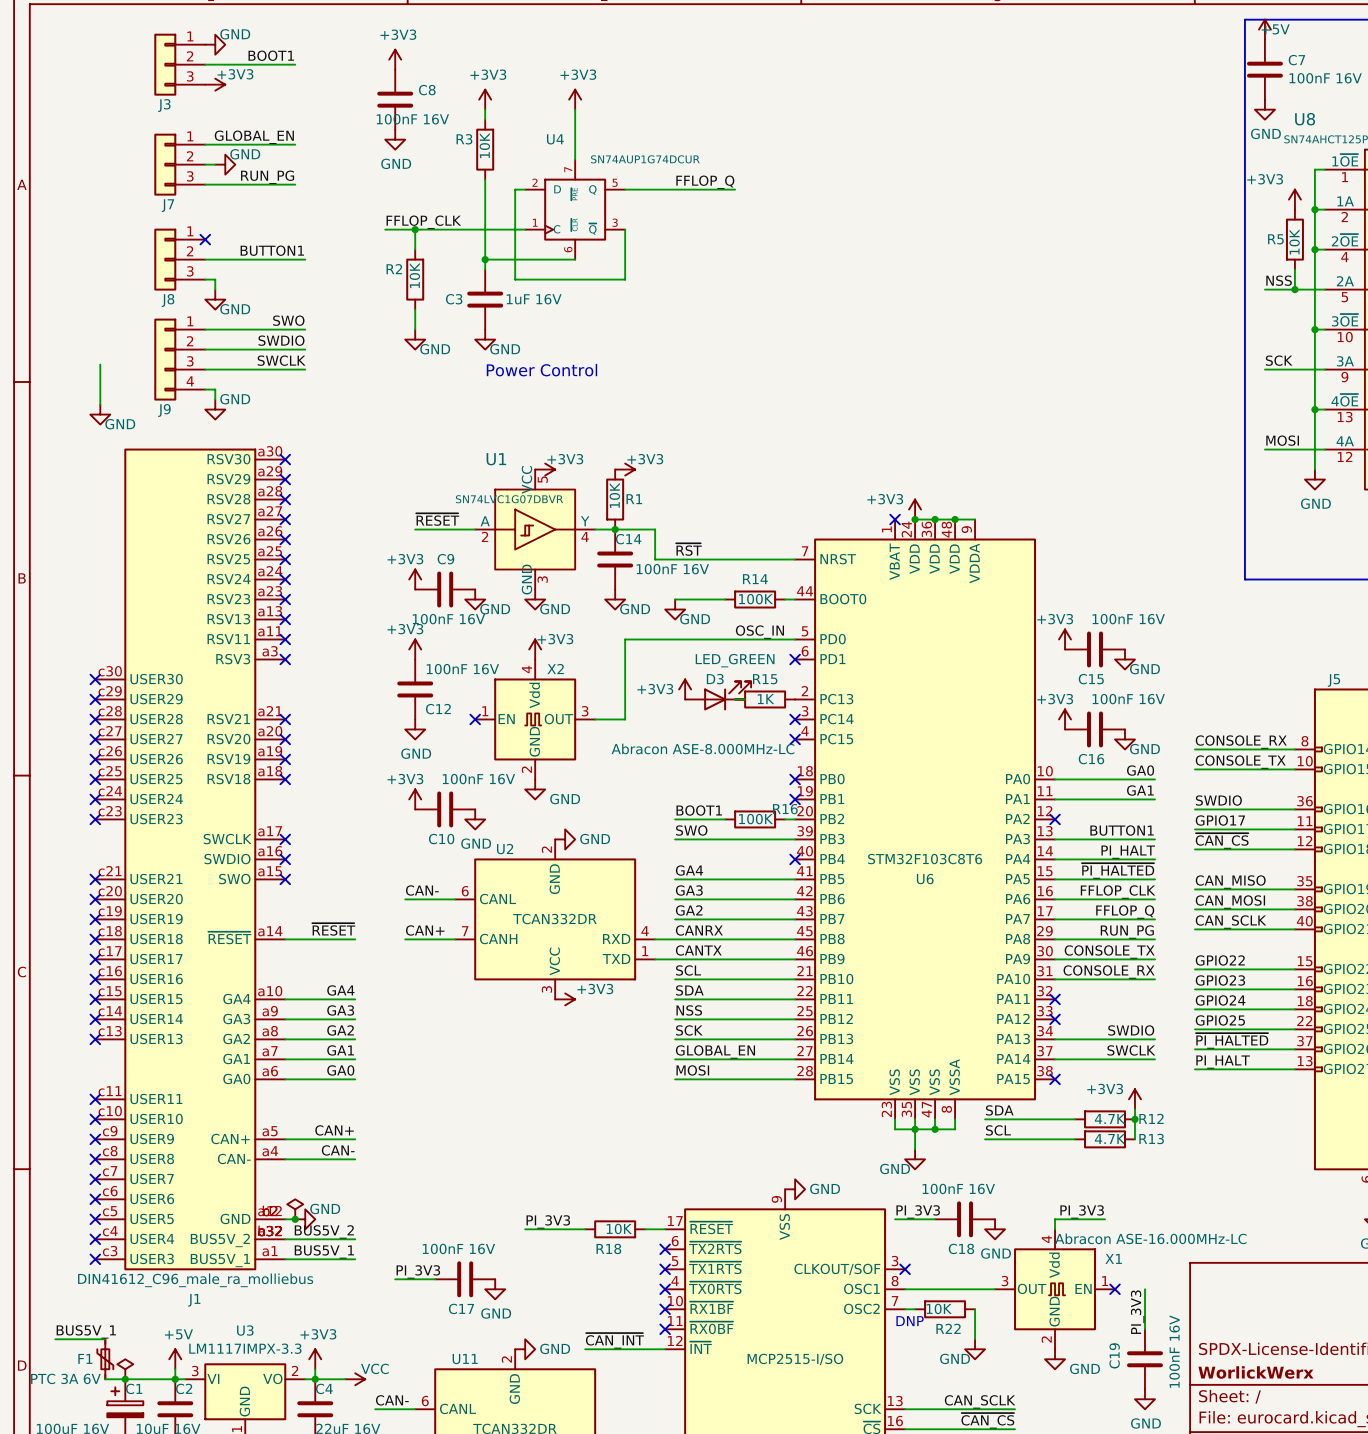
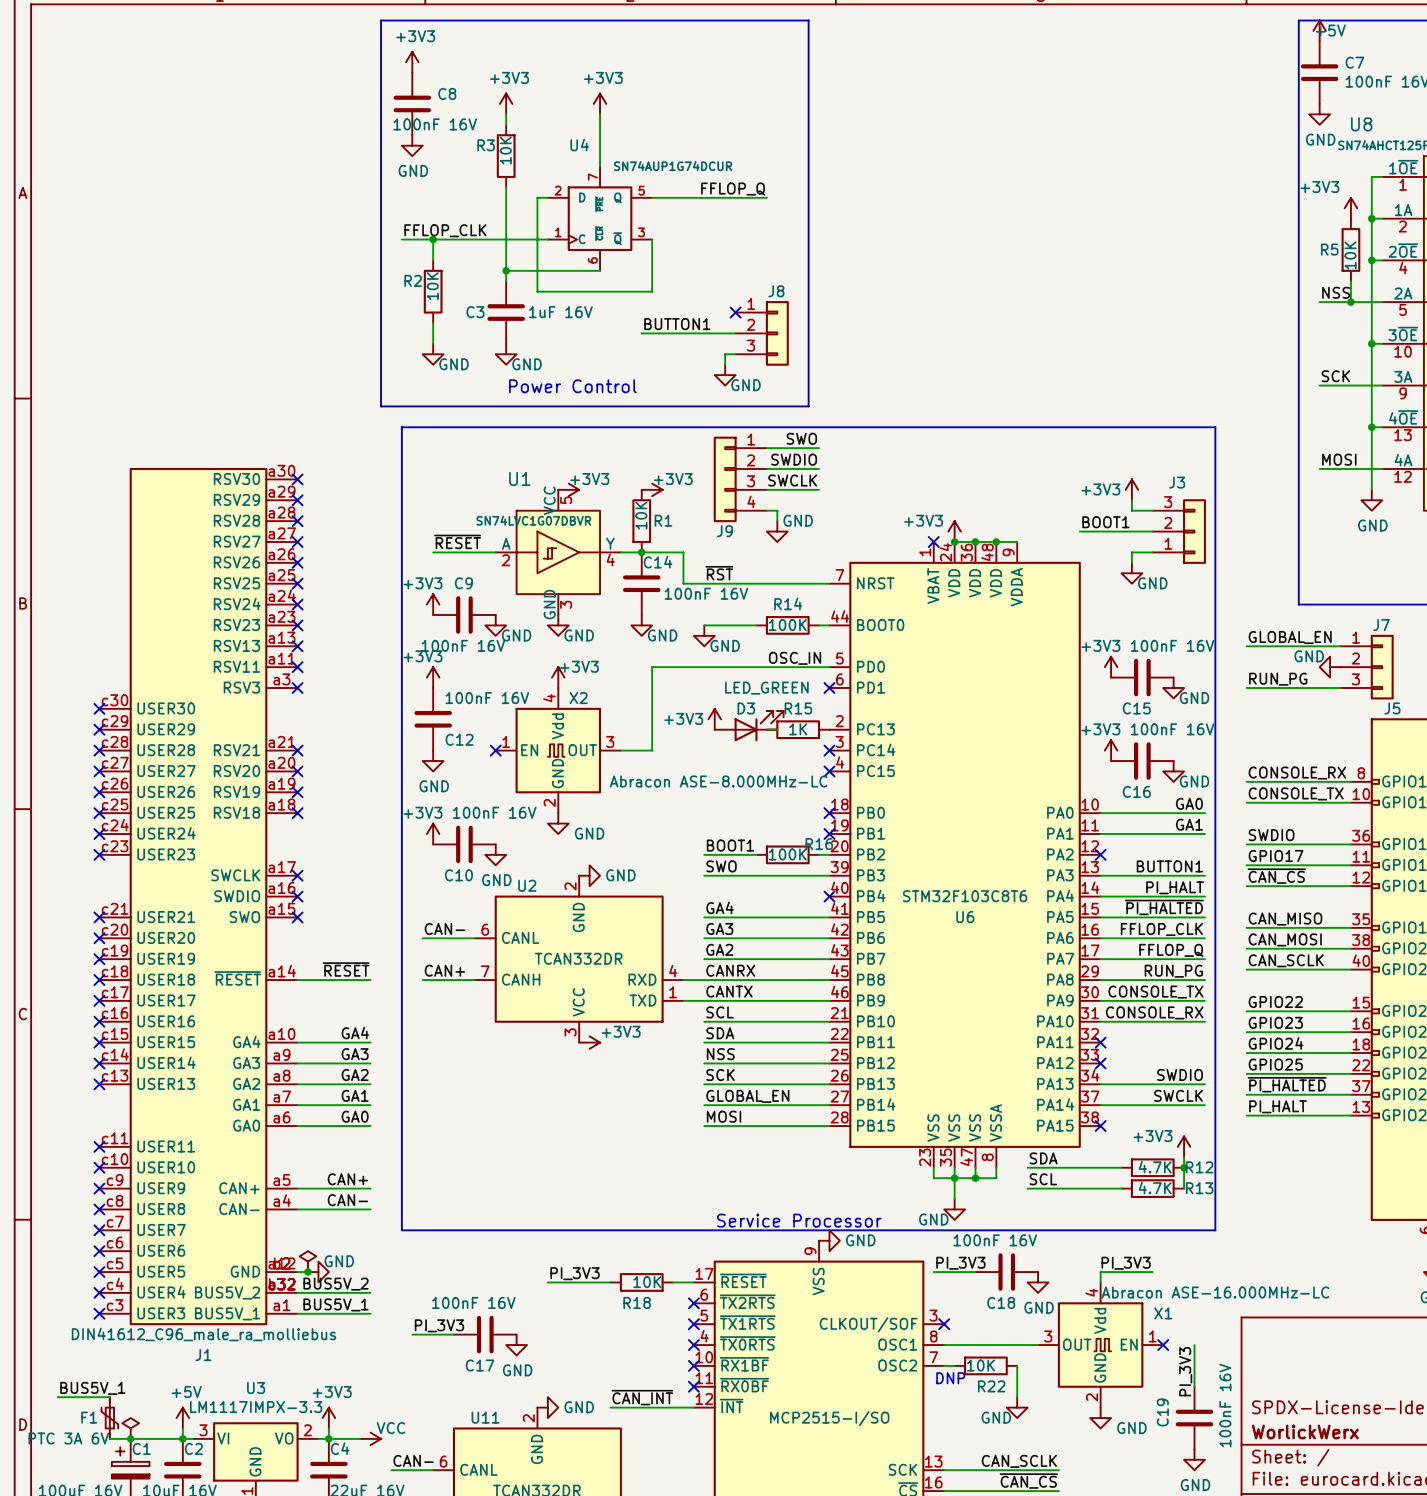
line: none -> (381, 20) (808, 20) (808, 406) (381, 406) (381, 20)
power symbol: GND (215, 44) -> none
label: BOOT1 (271, 55) -> none
J3 rotation: 0° (165, 64) -> 180° (1194, 531)
J3 position: (179, 64) -> (1179, 531)
wire: (205, 64) (295, 64) -> none
power symbol: +3V3 (215, 84) -> none
J3 name position: J3 (164, 105) -> J3 (1177, 482)
label: GLOBAL_EN (254, 137) -> none
wire: (205, 144) (295, 144) -> none
J7 flip: as is (165, 164) -> left-right (1382, 667)
J7 position: (179, 164) -> (1367, 667)
wire: (205, 164) (215, 164) -> none
power symbol: GND (225, 164) -> none
label: RUN_PG (267, 177) -> none
wire: (205, 184) (295, 184) -> none
J7 name position: J7 (167, 205) -> J7 (1381, 625)
no-connect mark: (205, 239) -> none
label: BUTTON1 (272, 250) -> none
J8 flip: as is (165, 259) -> left-right (777, 333)
J8 position: (179, 259) -> (762, 333)
wire: (205, 259) (305, 259) -> none
wire: (205, 279) (215, 279) (215, 289) -> none
power symbol: GND (215, 299) -> none
no-connect mark: none -> (735, 312)
J8 name position: J8 (168, 300) -> J8 (776, 291)
label: none -> BUTTON1 (677, 324)
wire: none -> (641, 333) (735, 333)
label: SWO (288, 320) -> none
wire: (205, 329) (305, 329) -> none
wire: none -> (735, 354) (725, 354) (725, 364)
label: SWDIO (281, 340) -> none
wire: (205, 349) (305, 349) -> none
J9 position: (179, 359) -> (740, 479)
power symbol: none -> GND (725, 375)
label: SWCLK (281, 360) -> none
wire: (100, 364) (100, 404) -> none
wire: (205, 369) (305, 369) -> none
wire: (205, 389) (215, 389) (215, 399) -> none
power symbol: GND (215, 409) -> none
line: none -> (401, 427) (1215, 427) (1215, 1230) (401, 1230) (401, 427)
power symbol: GND (100, 414) -> none
label: none -> SWO (801, 438)
wire: none -> (766, 448) (819, 448)
label: none -> SWDIO (794, 459)
wire: none -> (766, 468) (819, 468)
label: none -> SWCLK (792, 480)
wire: none -> (766, 489) (819, 489)
power symbol: none -> +3V3 (1131, 489)
wire: none -> (1131, 500) (1131, 510) (1152, 510)
wire: none -> (766, 510) (777, 510) (777, 521)
label: none -> BOOT1 (1105, 522)
power symbol: none -> GND (777, 531)
wire: none -> (1079, 531) (1152, 531)
wire: none -> (1152, 552) (1131, 552) (1131, 562)
power symbol: none -> GND (1131, 573)
label: none -> GLOBAL_EN (1290, 637)
wire: none -> (1246, 646) (1340, 646)
power symbol: none -> GND (1330, 667)
label: none -> RUN_PG (1278, 679)
wire: none -> (1246, 688) (1340, 688)
text: none -> Service Processor (799, 1220)

